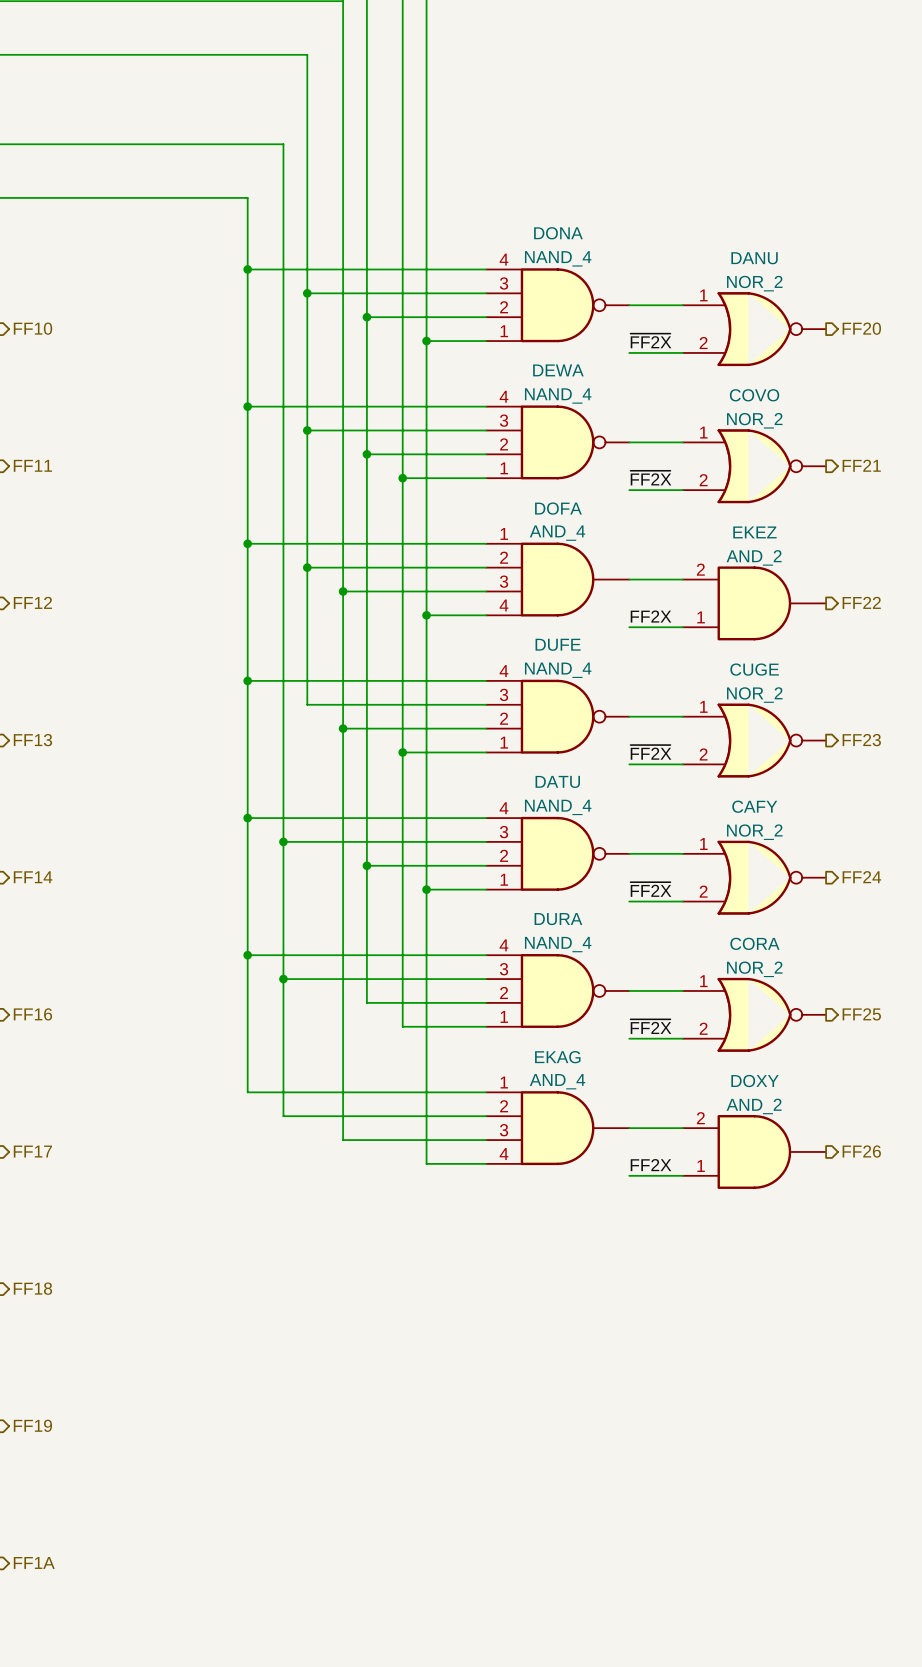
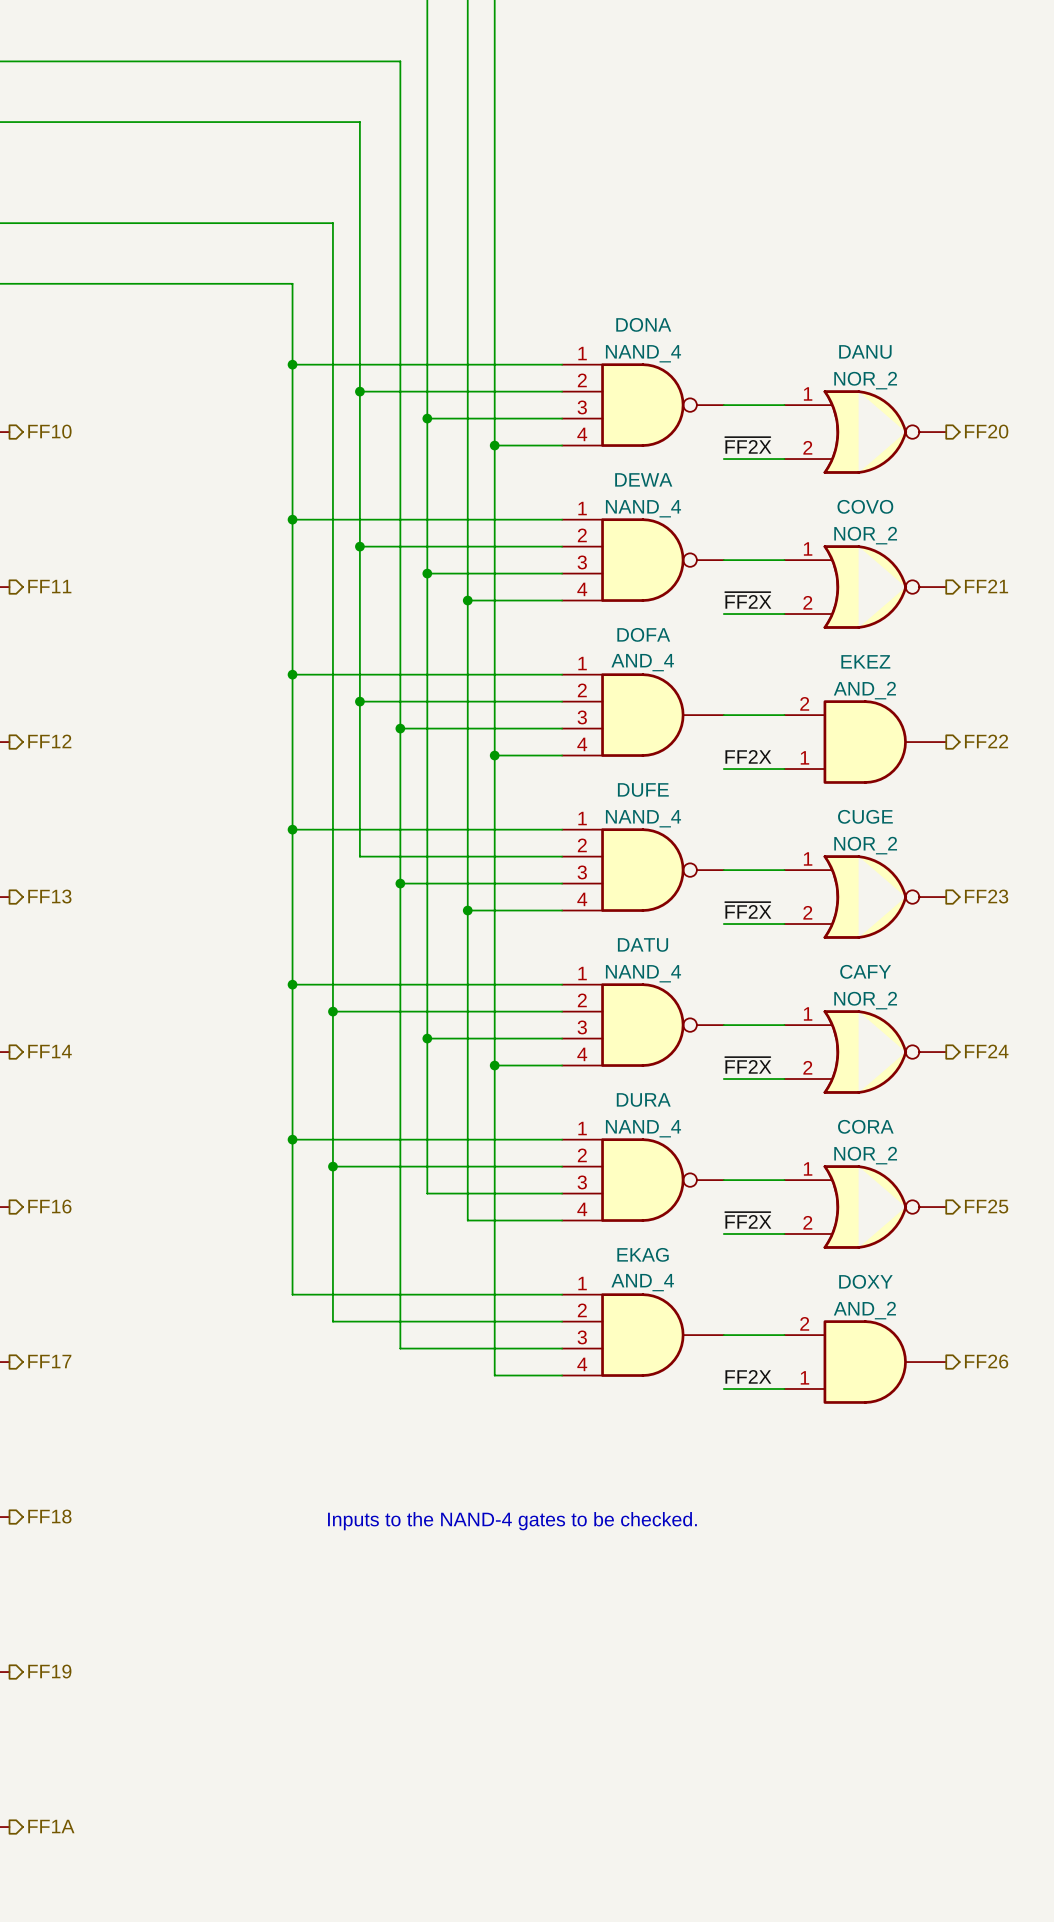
DONA flip: as is (557, 305) -> up-down (642, 405)
DEWA flip: as is (557, 442) -> up-down (642, 560)
DUFE flip: as is (557, 716) -> up-down (642, 870)
DATU flip: as is (557, 853) -> up-down (642, 1025)
DURA flip: as is (557, 990) -> up-down (642, 1180)
text: none -> Inputs to the NAND-4 gates to be checked. (512, 1521)

